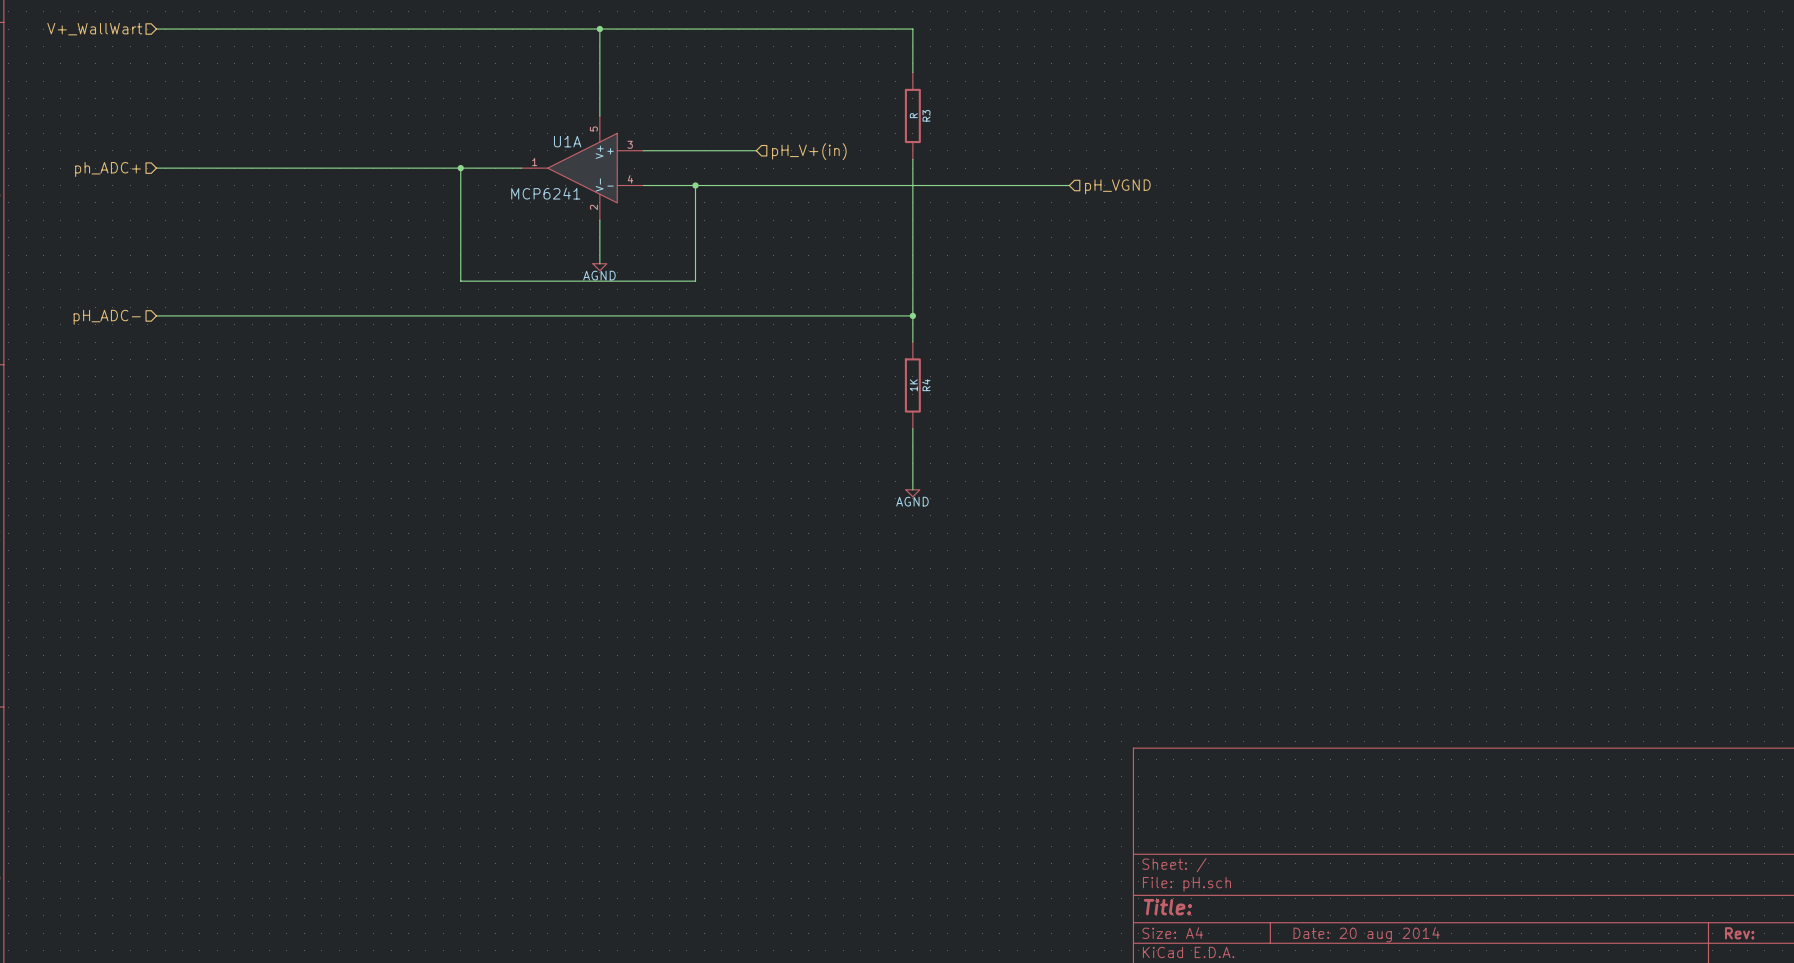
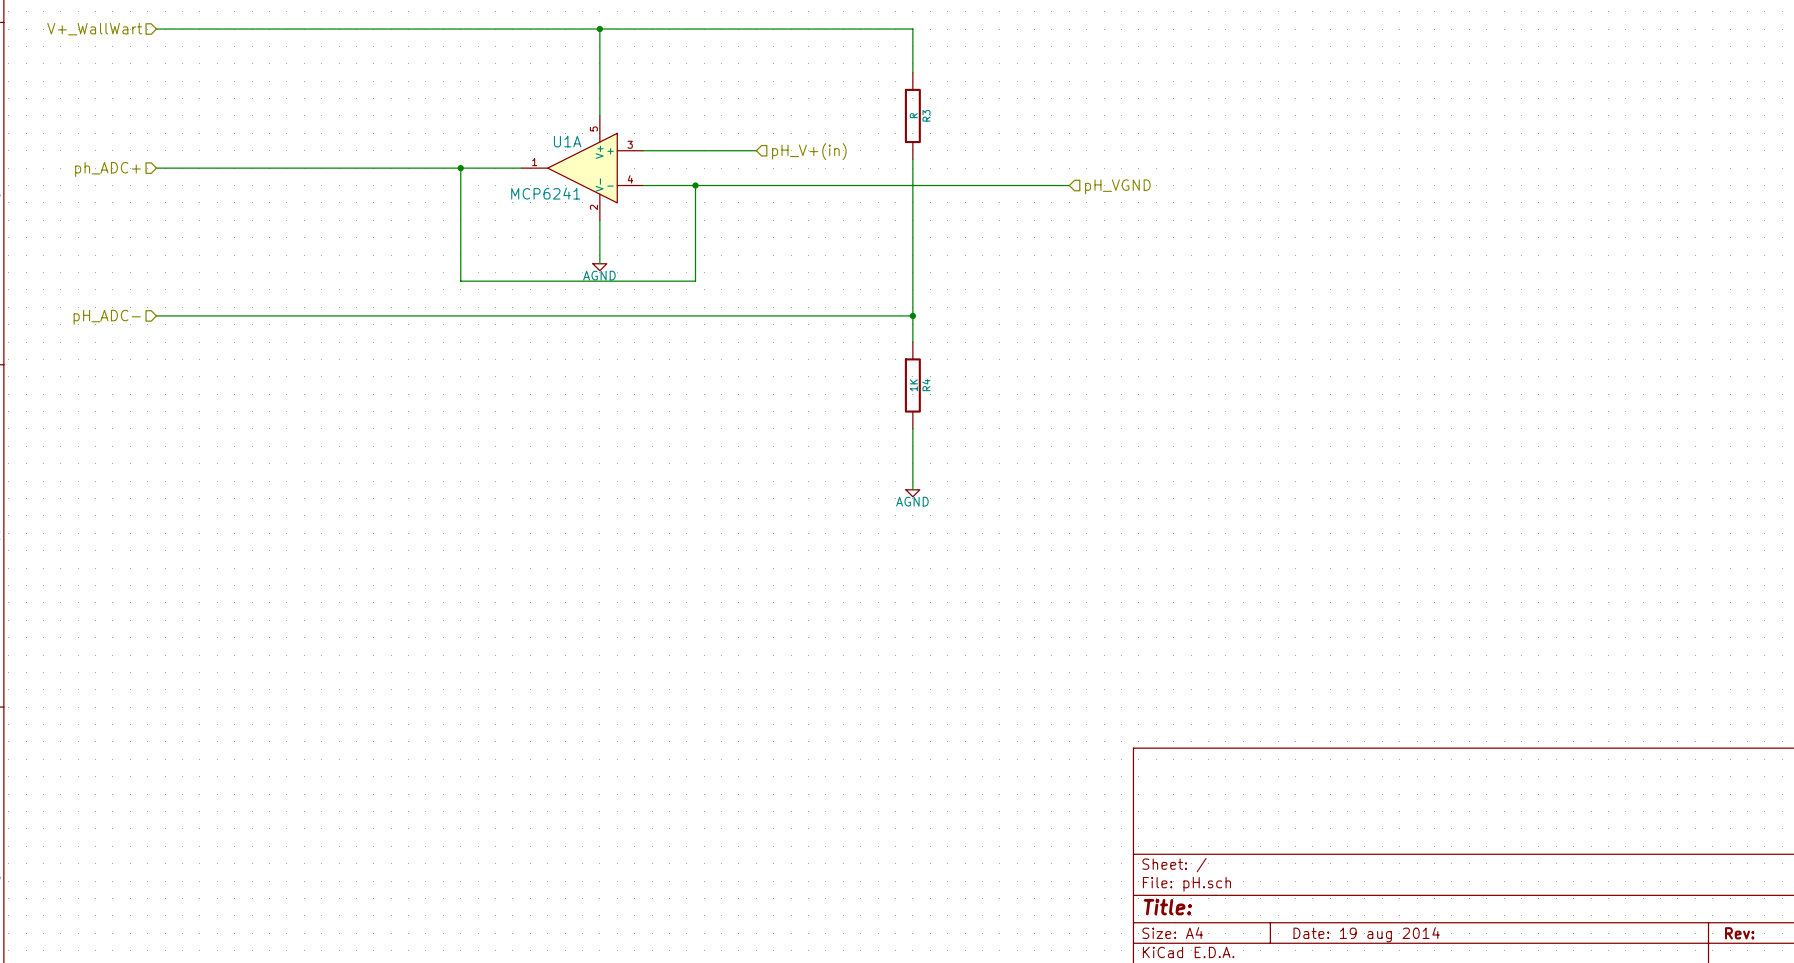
title block: Date: 20 aug 2014 (1366, 934) -> Date: 19 aug 2014 (1366, 934)

